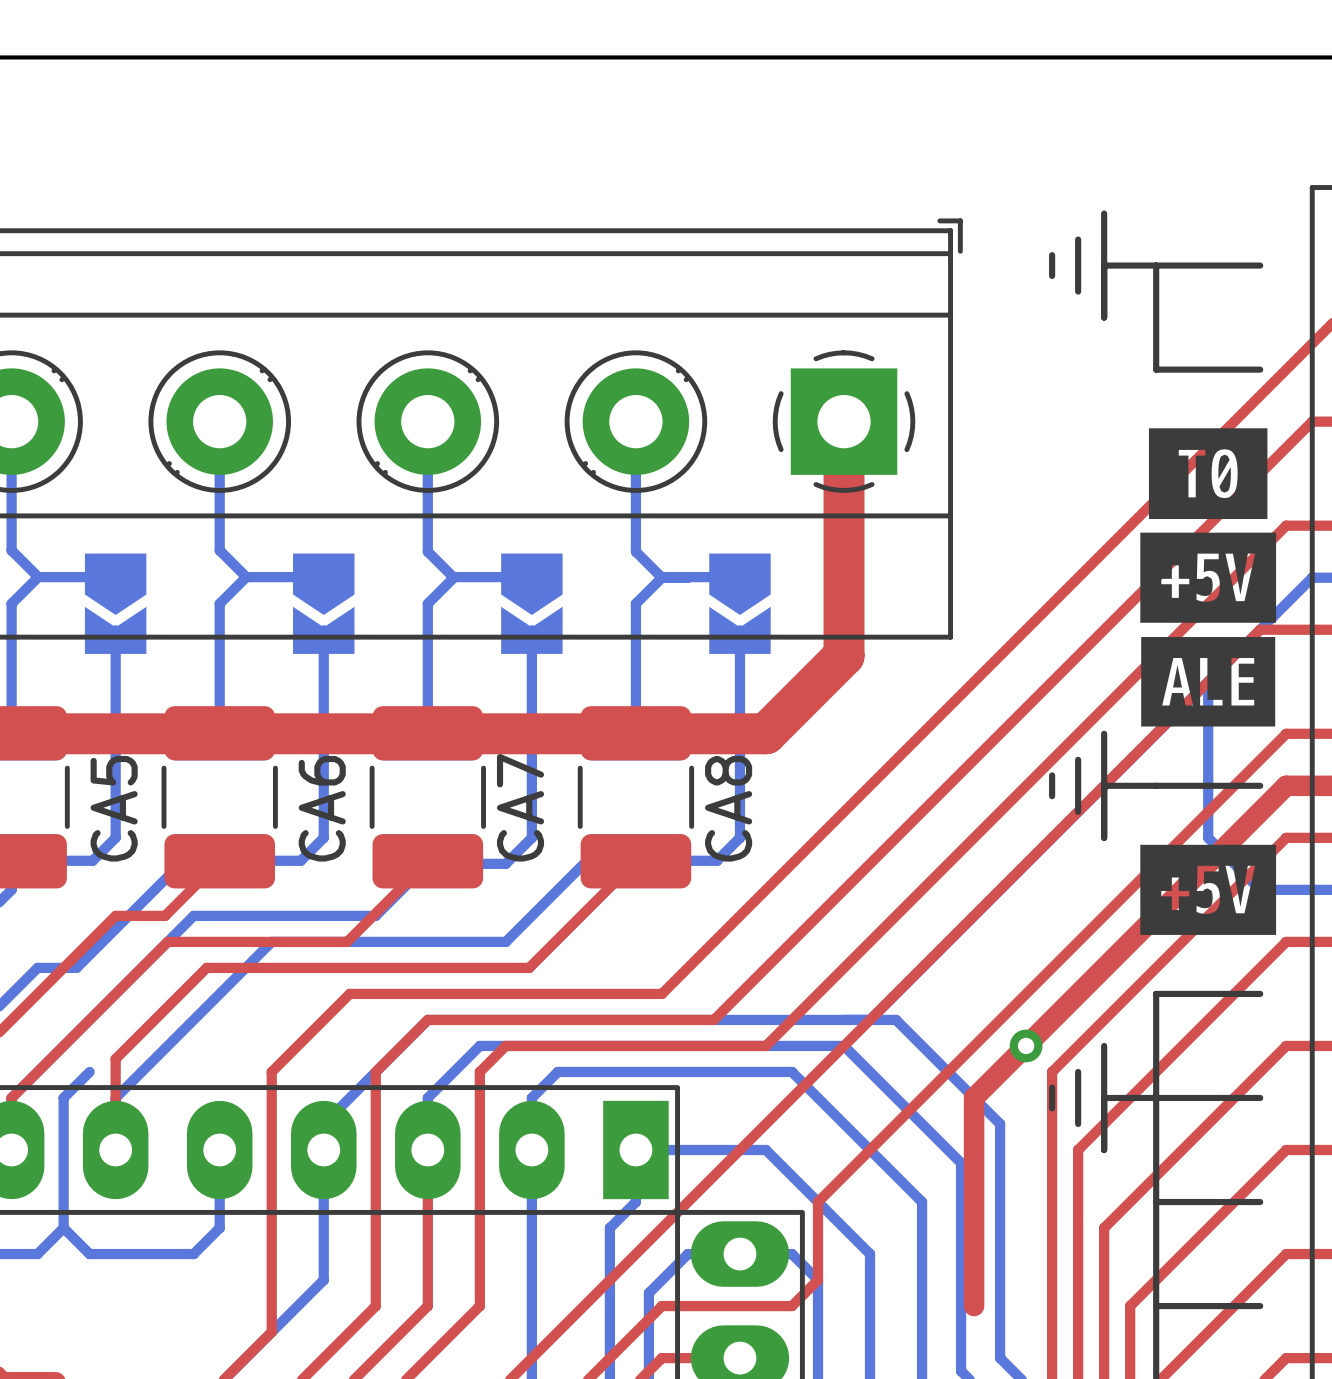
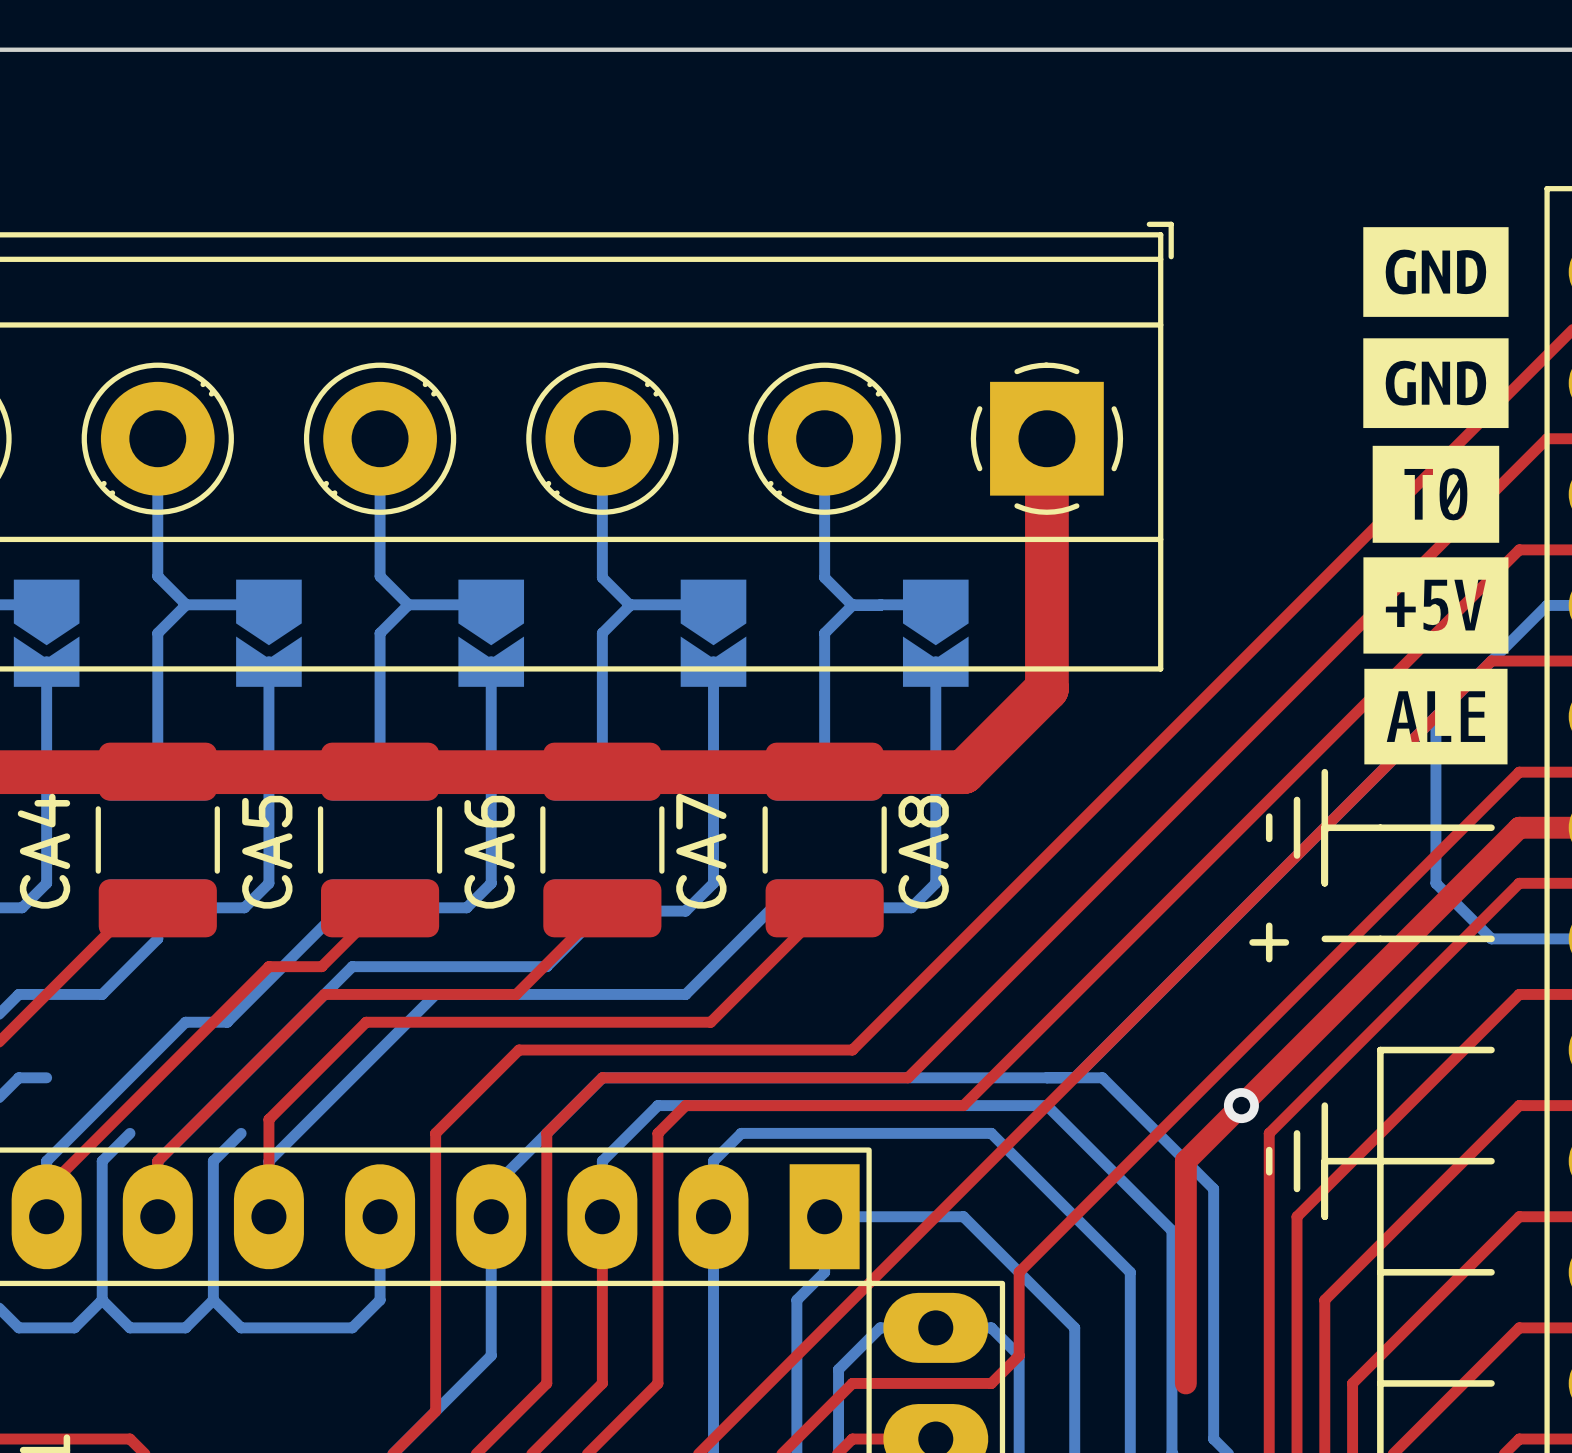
line: (1104, 213) (1104, 317) -> none
drawing: none -> [1363, 227, 1509, 429]
line: (1078, 239) (1078, 291) -> none
line: (1052, 255) (1052, 275) -> none
line: (1104, 265) (1260, 265) -> (1324, 938) (1491, 938)
line: (1156, 265) (1156, 369) (1260, 369) -> none
drawing: [1140, 844, 1277, 935] -> none
text: none -> + (1269, 942)

